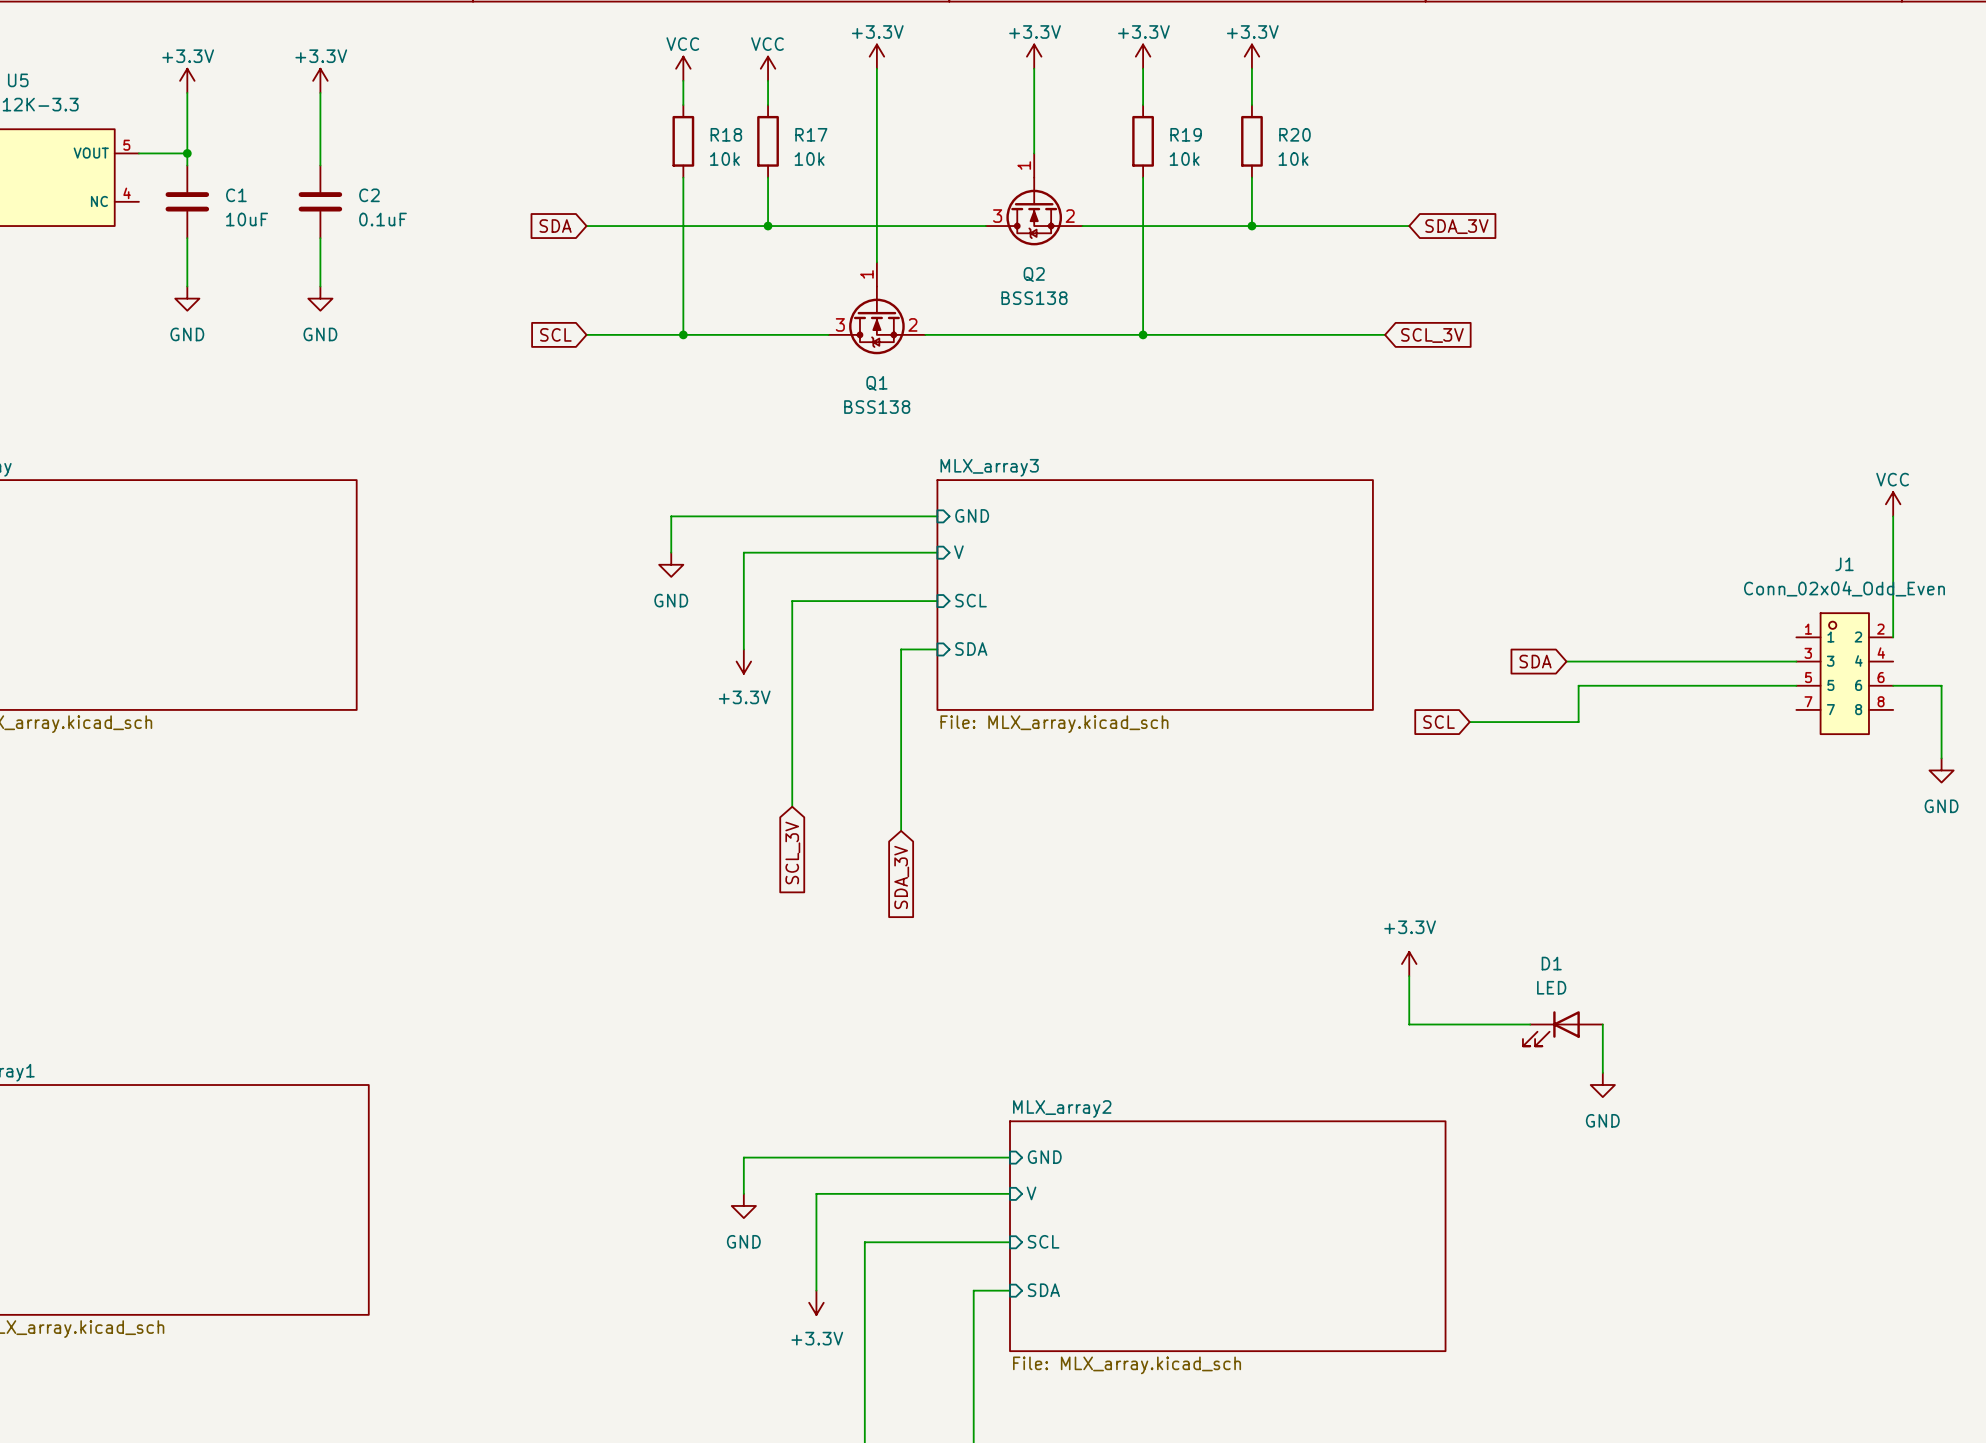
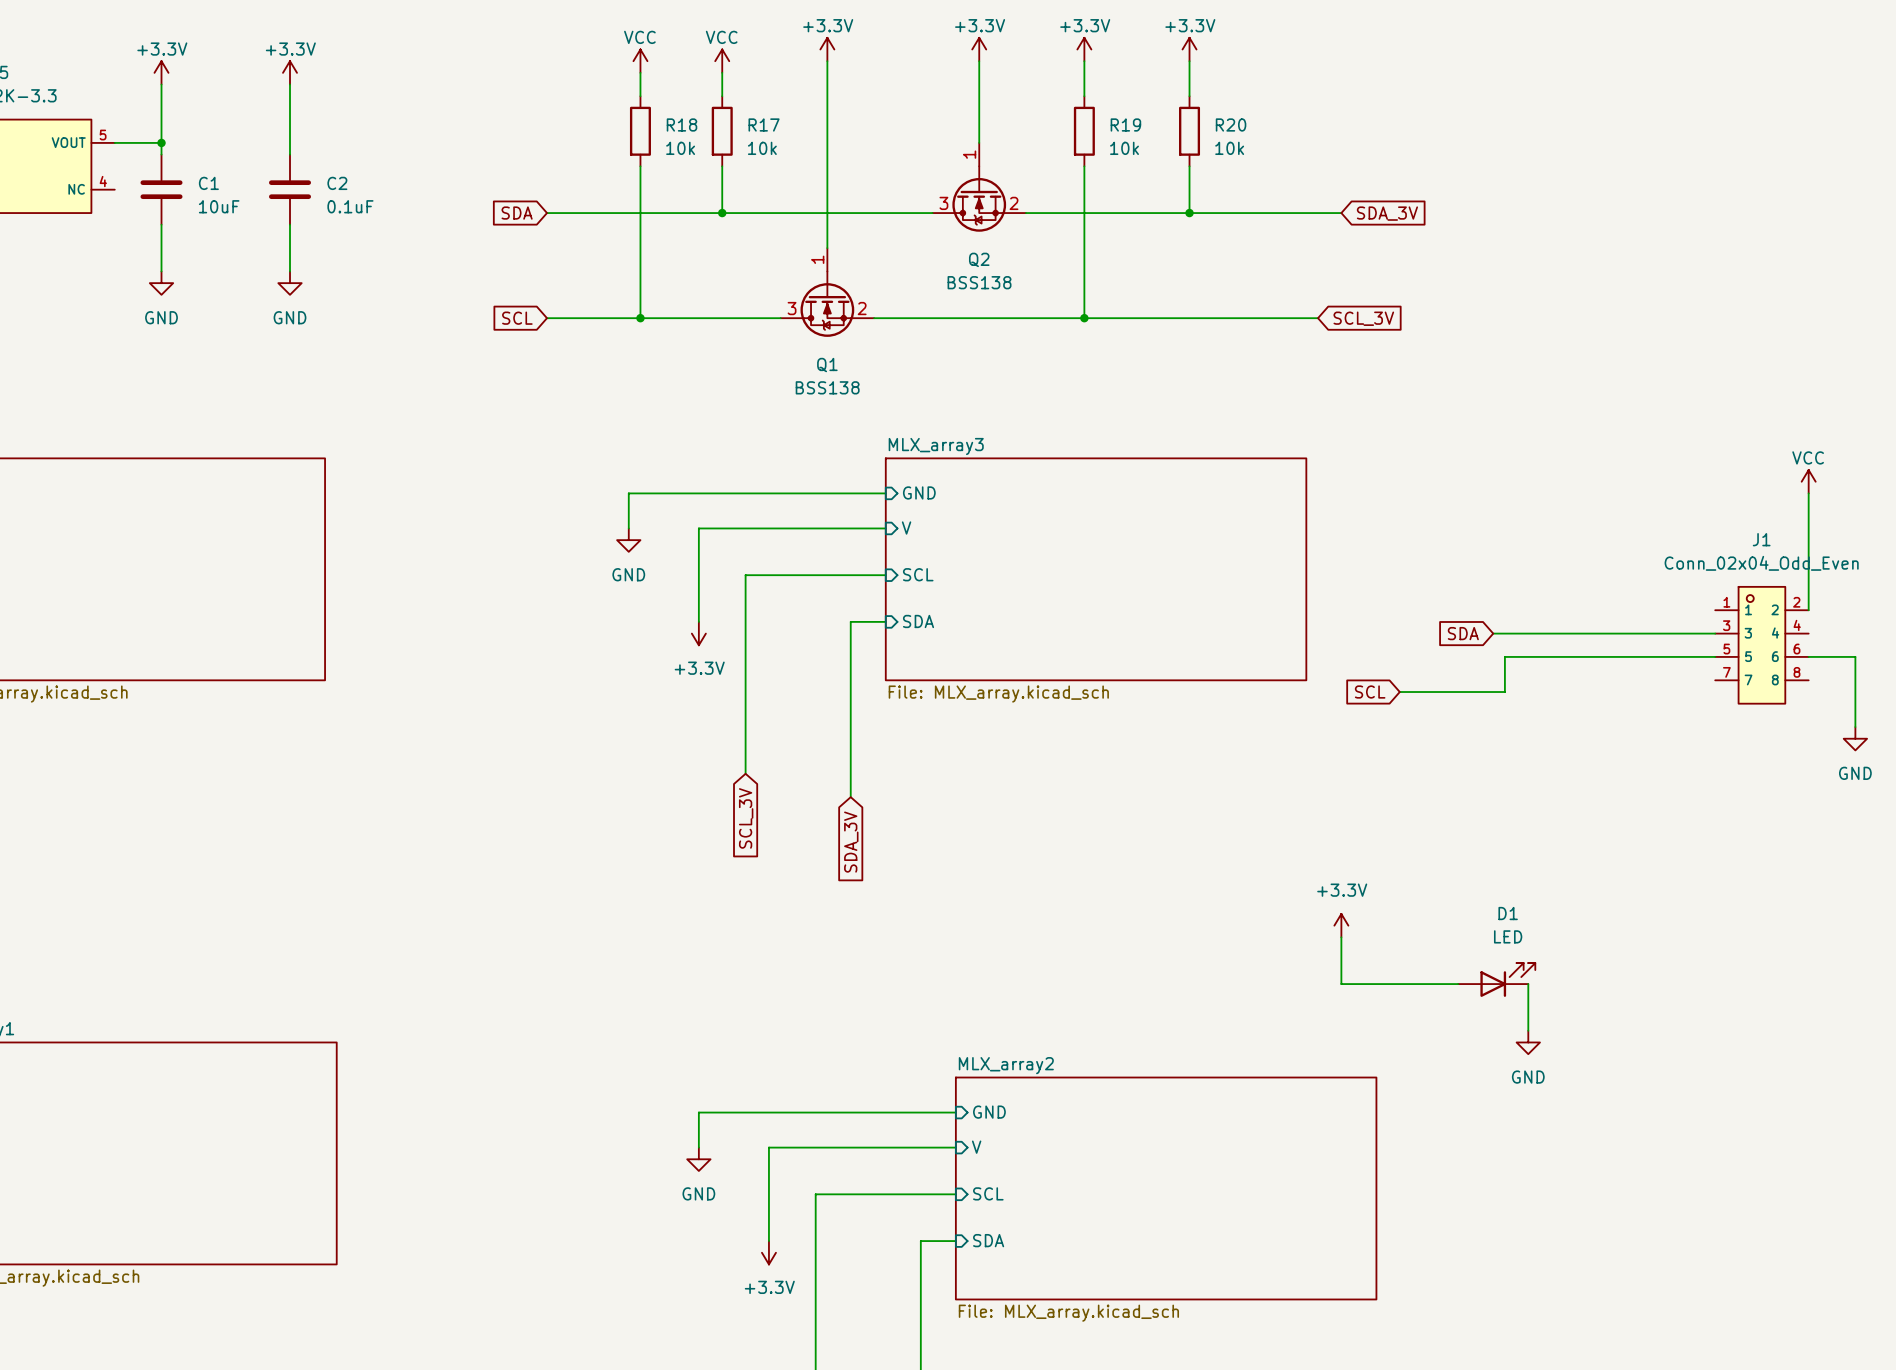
D1 name position: D1 (1551, 963) -> D1 (1508, 913)
D1 value position: LED (1551, 987) -> LED (1508, 936)
D1 rotation: 0° (1551, 1028) -> 180° (1507, 979)

